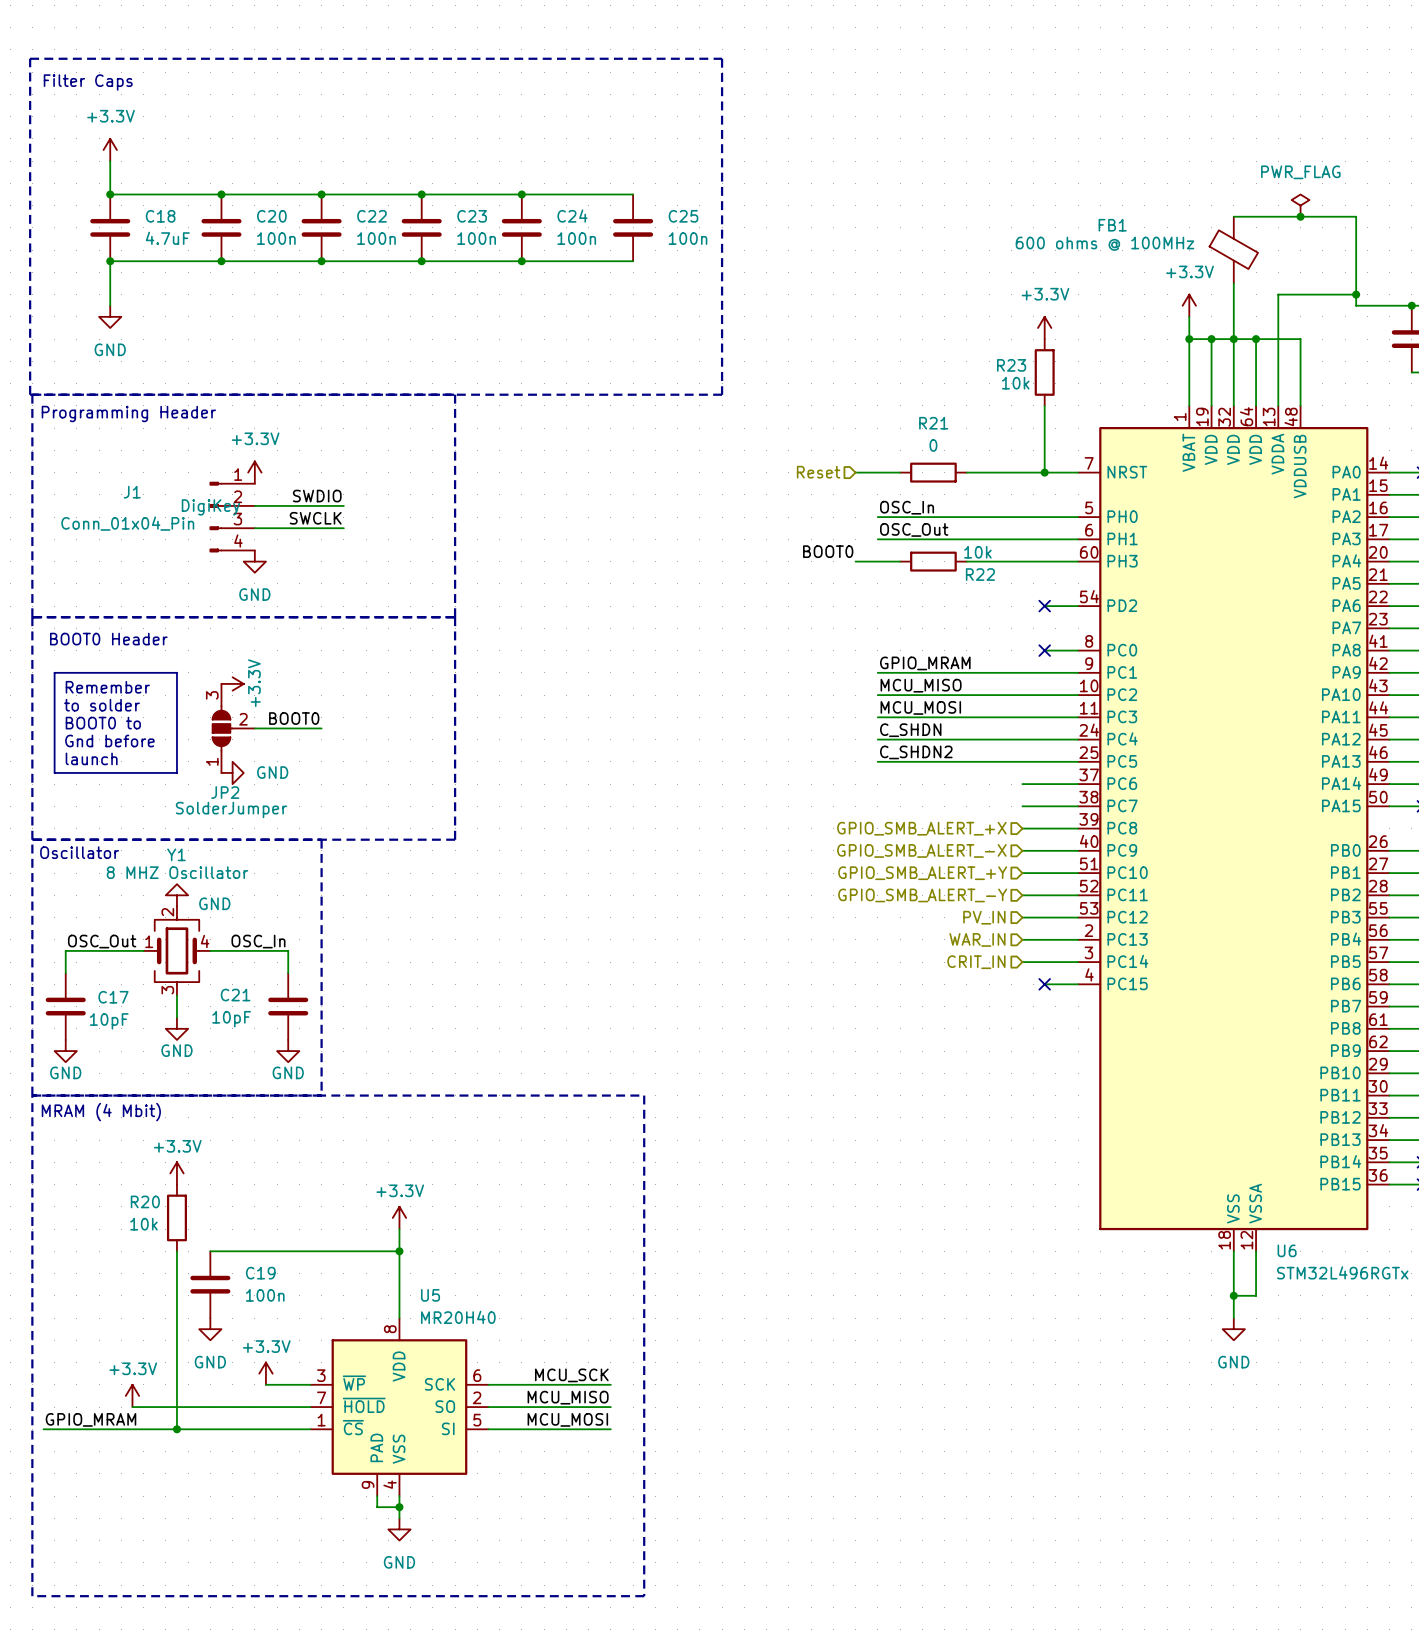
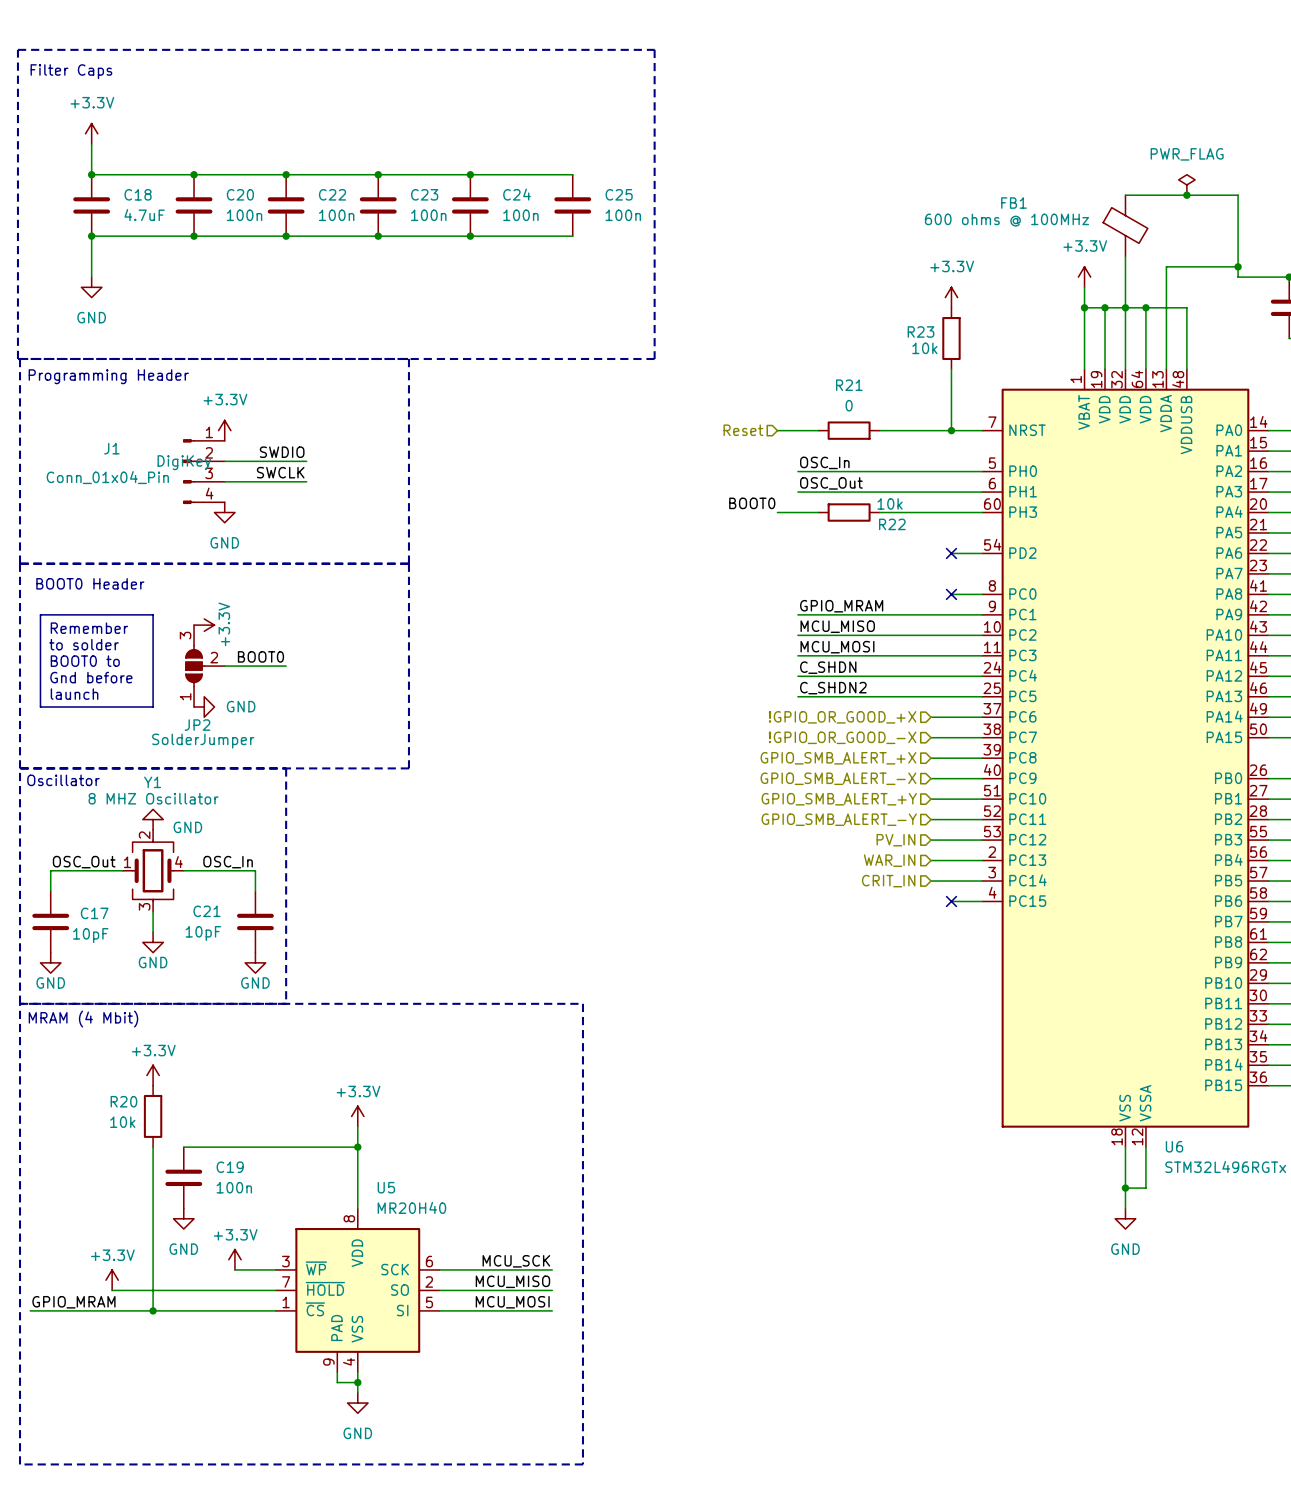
hierarchical label: none -> !GPIO_OR_GOOD_+X (842, 717)
hierarchical label: none -> !GPIO_OR_GOOD_-X (842, 737)

